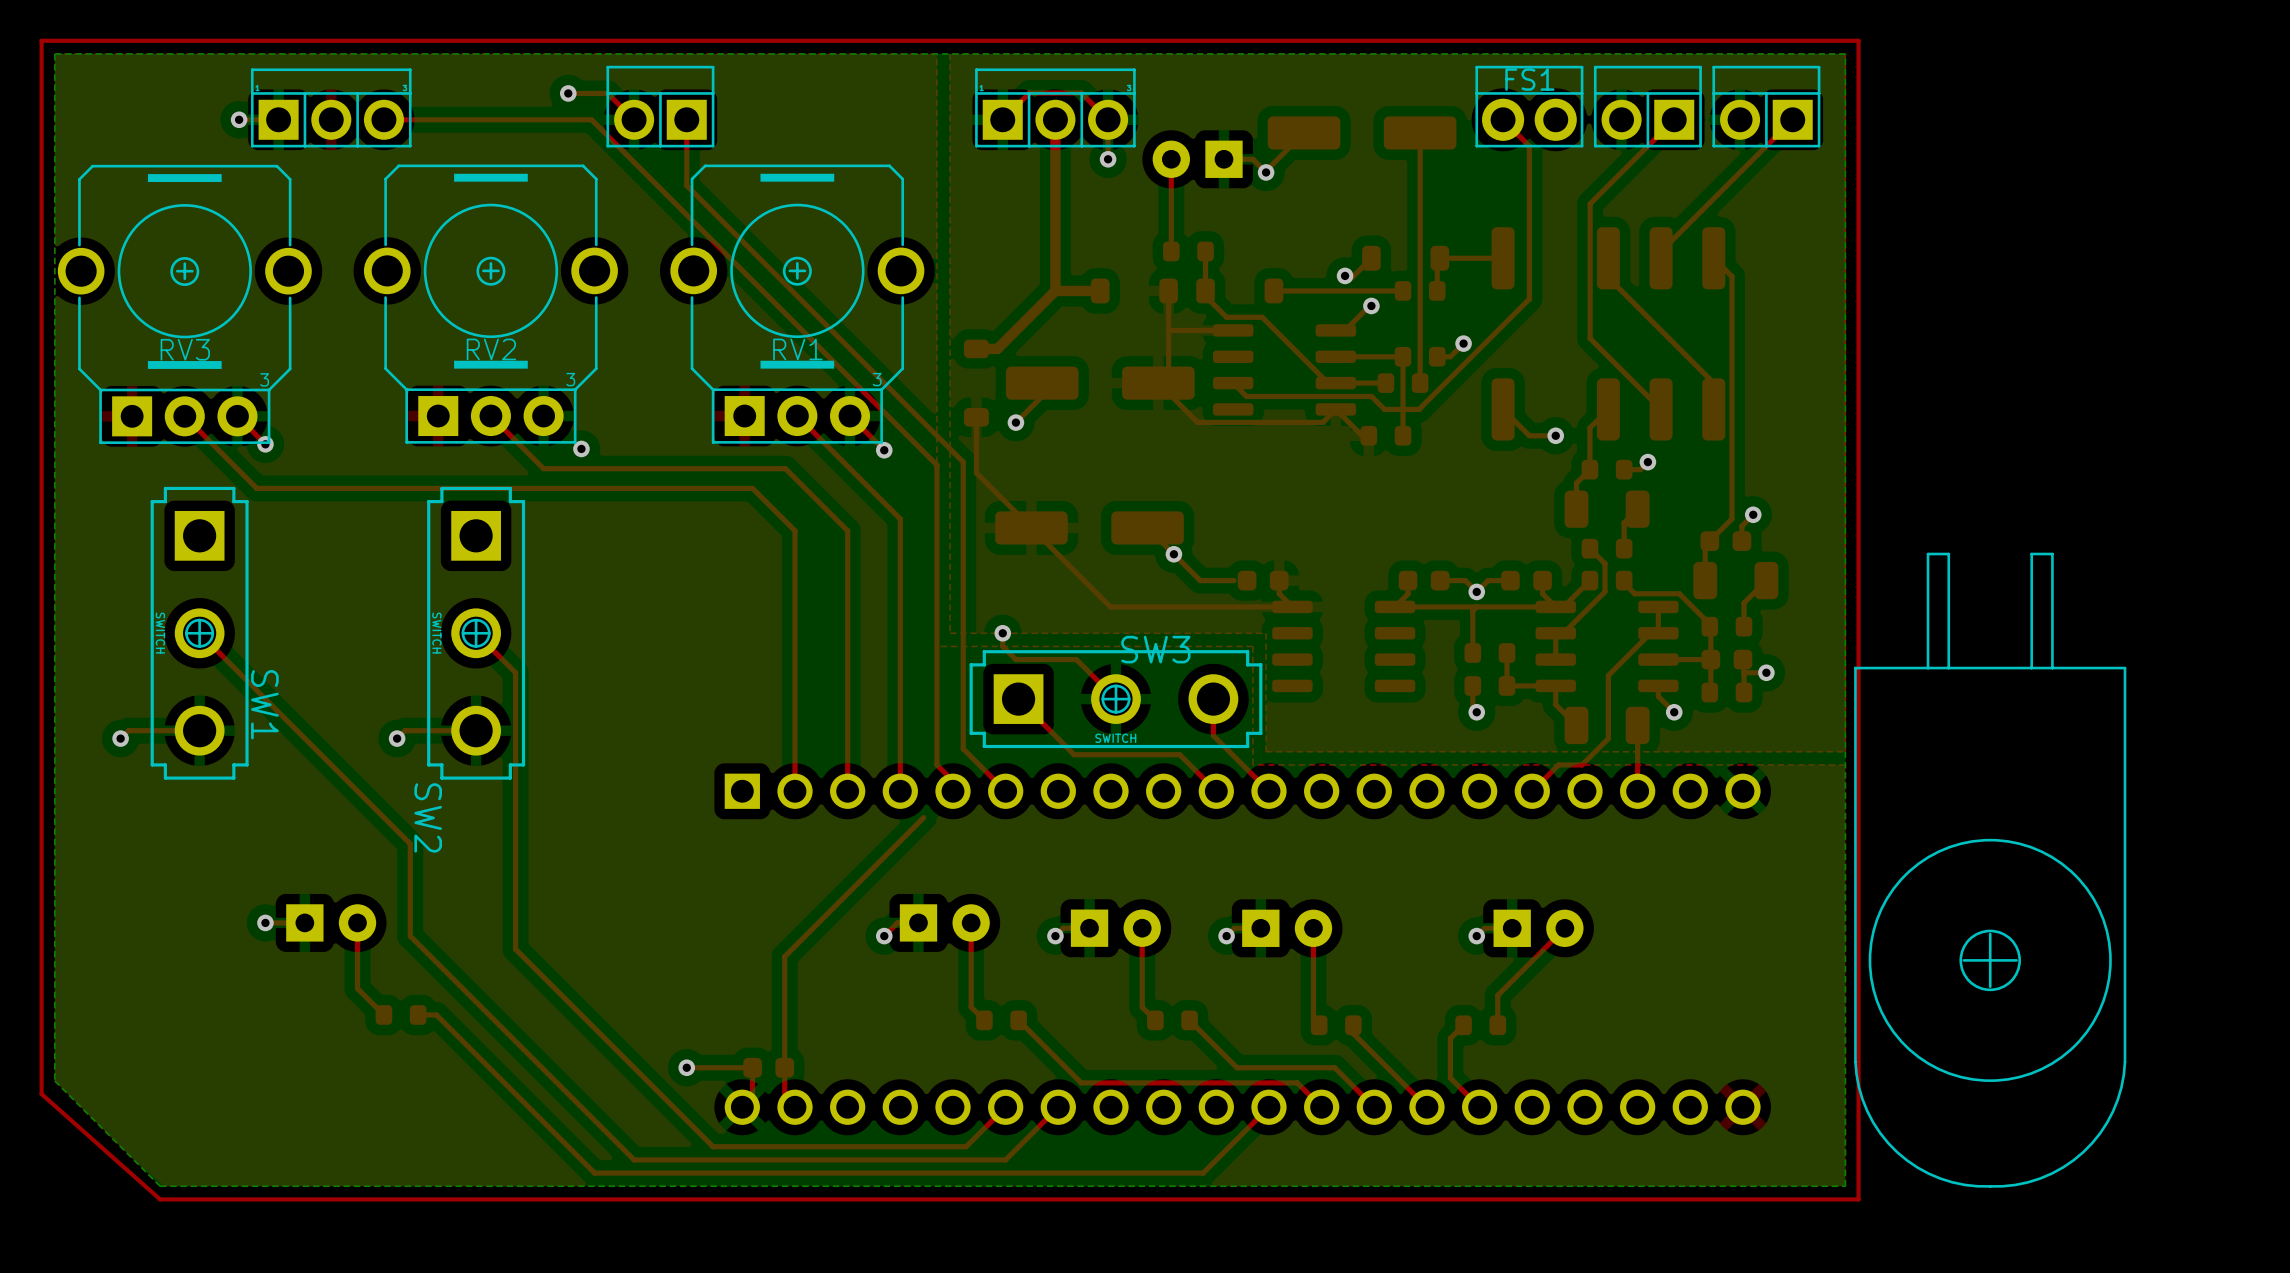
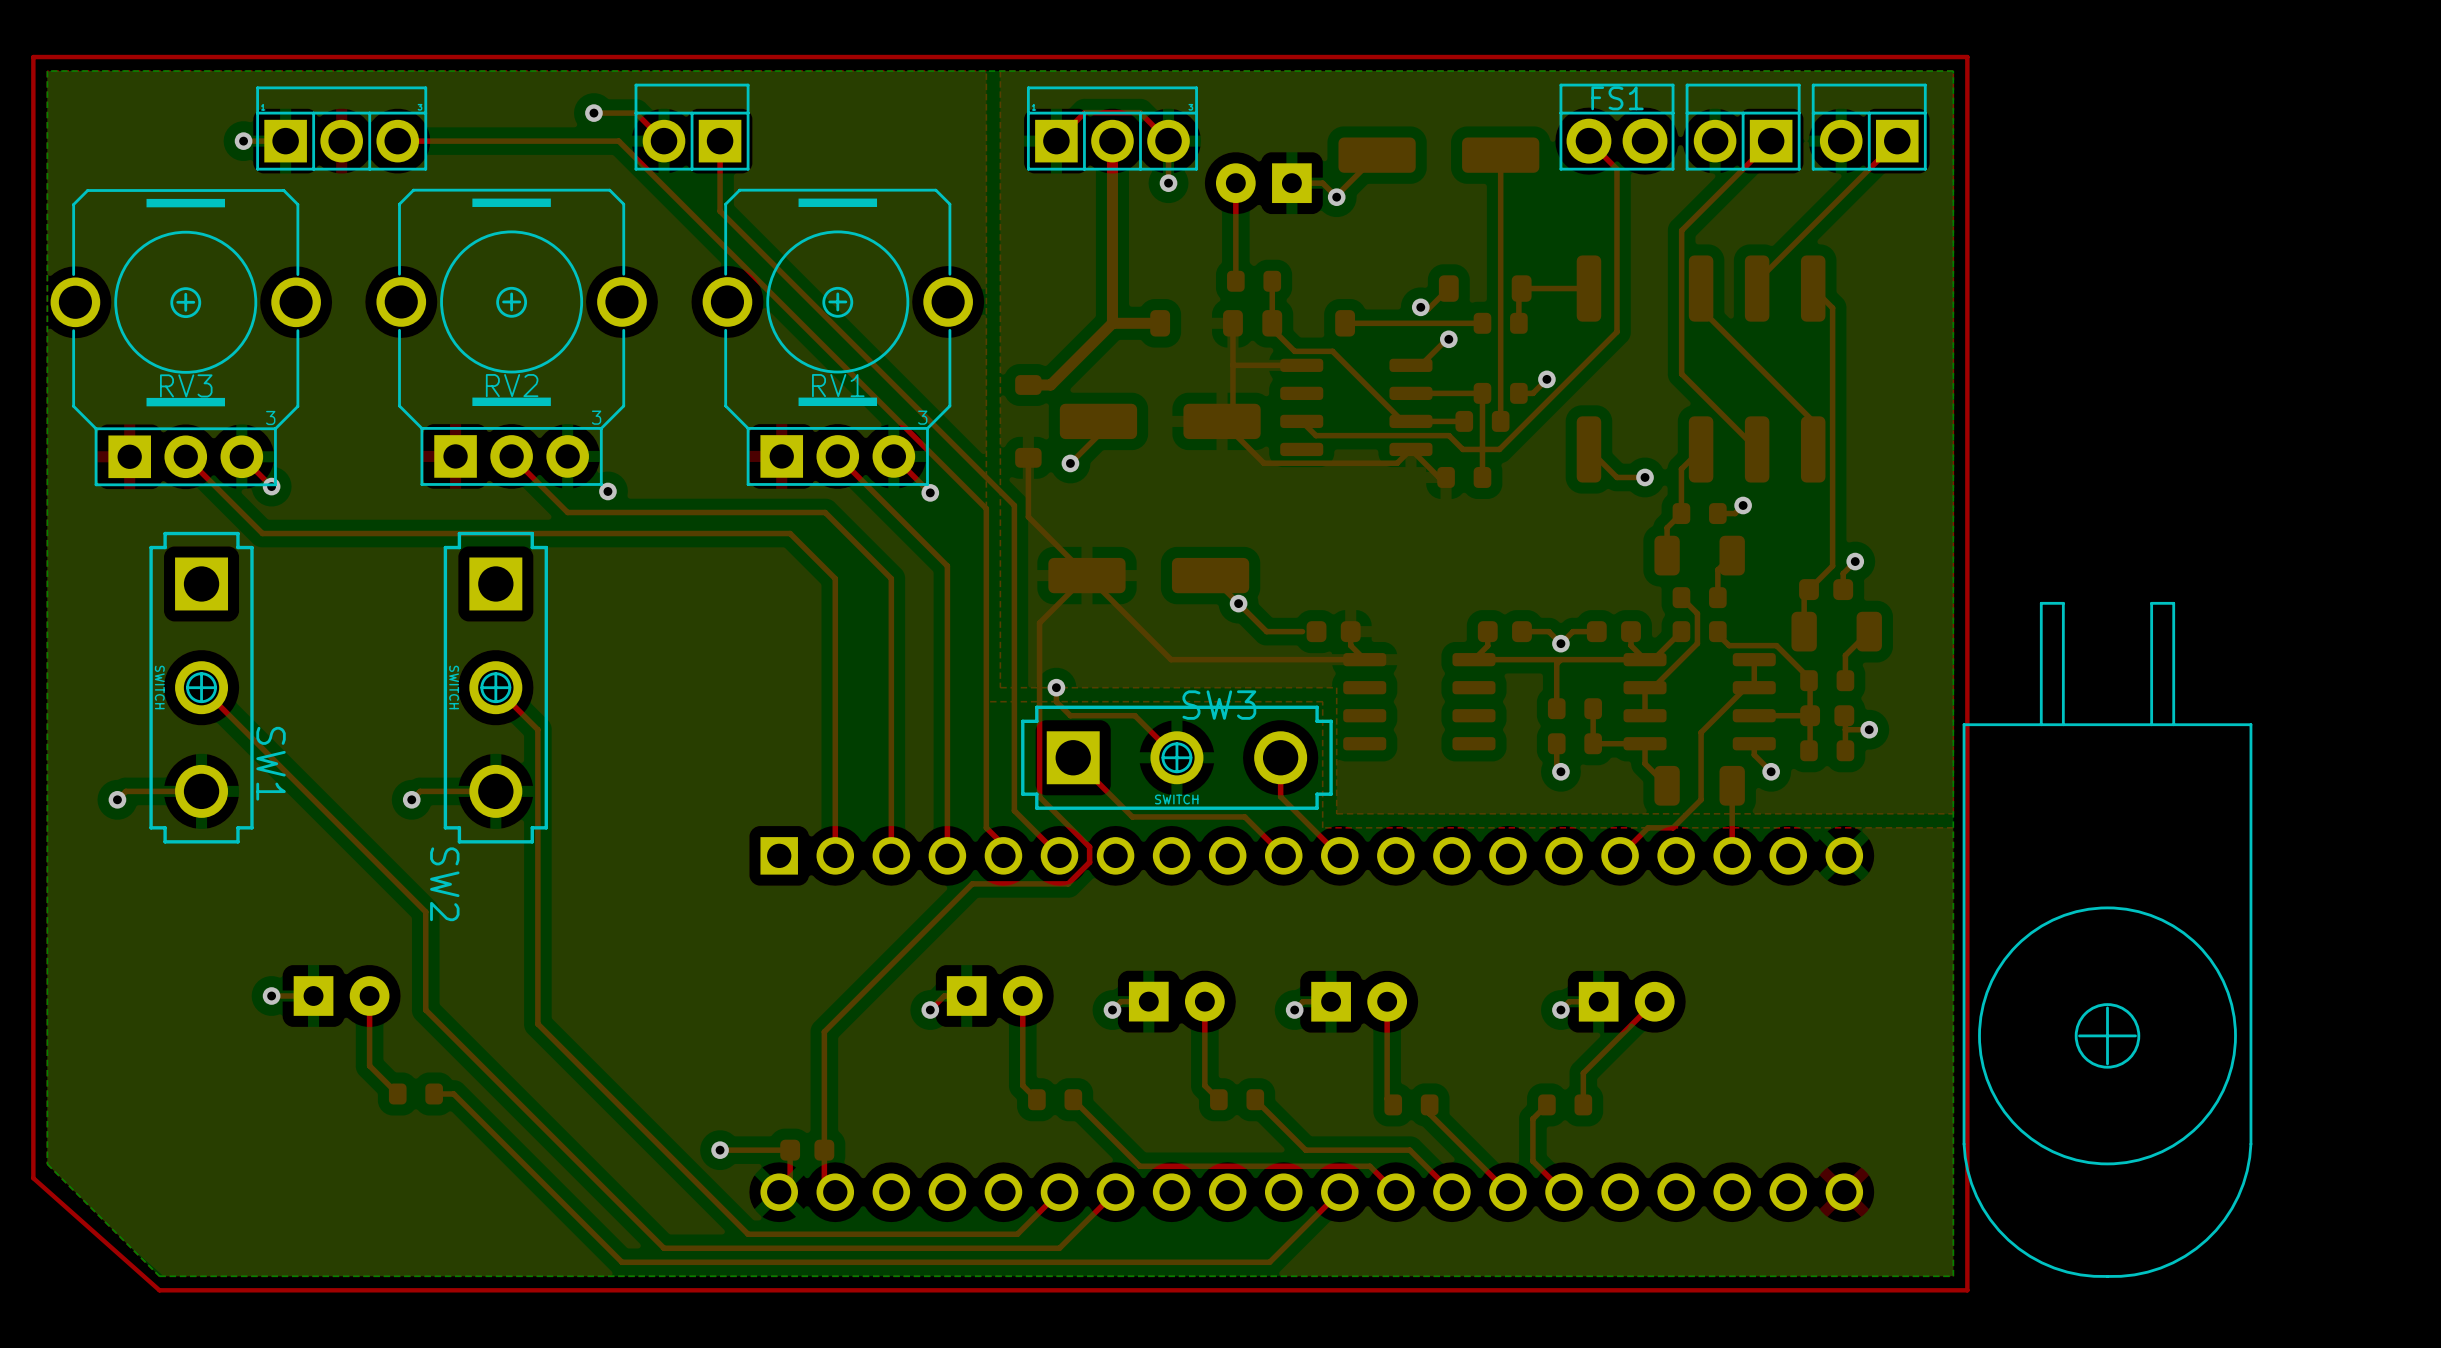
top track: none -> (1086, 575) (1039, 622) (1039, 796) (1089, 847) (1089, 862) (1068, 883) (972, 883)

